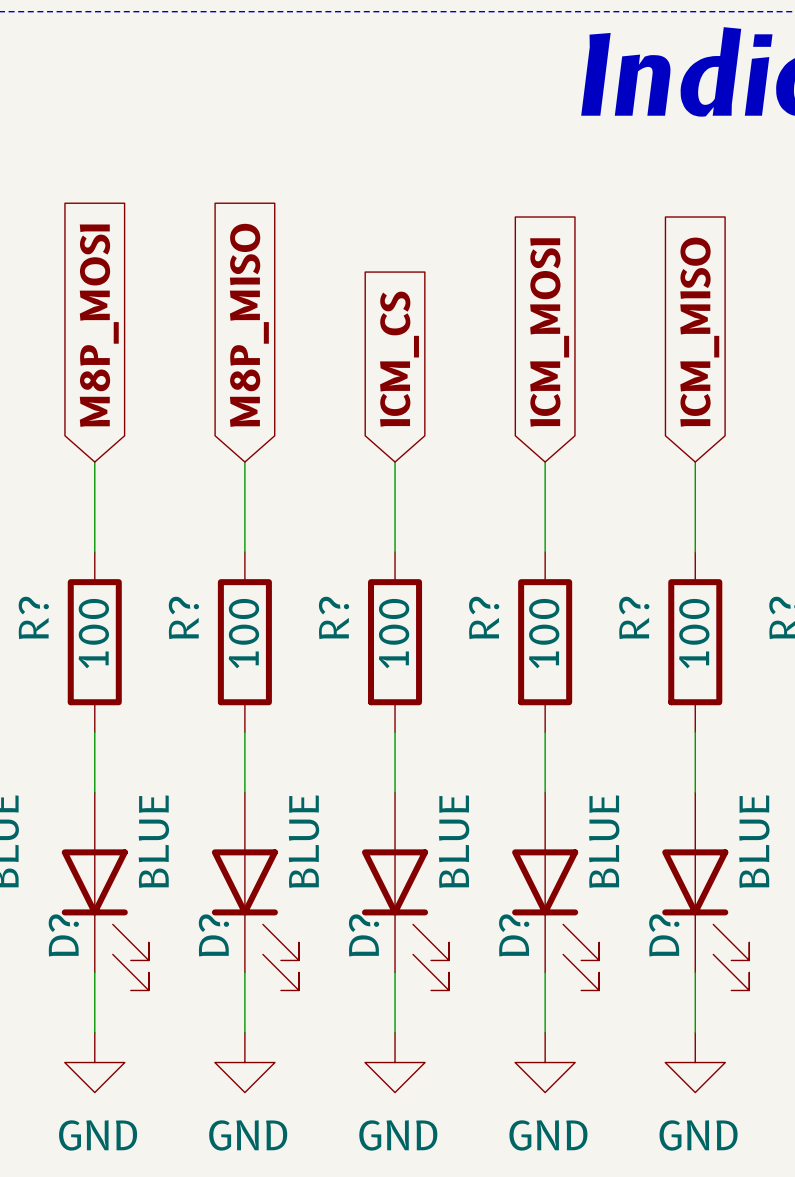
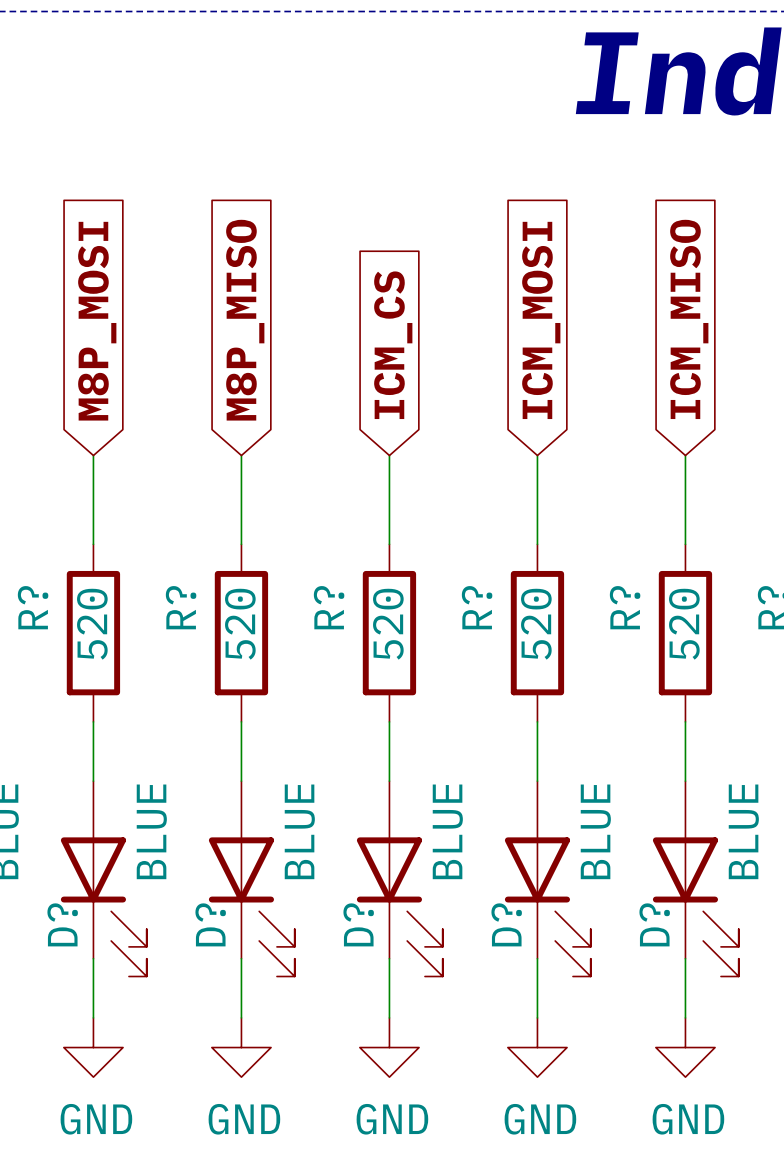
R? value: 100 (93, 633) -> 520 (92, 624)
R? value: 100 (243, 633) -> 520 (240, 624)
R? value: 100 (394, 633) -> 520 (388, 624)
R? value: 100 (544, 633) -> 520 (536, 624)
R? value: 100 (694, 633) -> 520 (684, 624)

